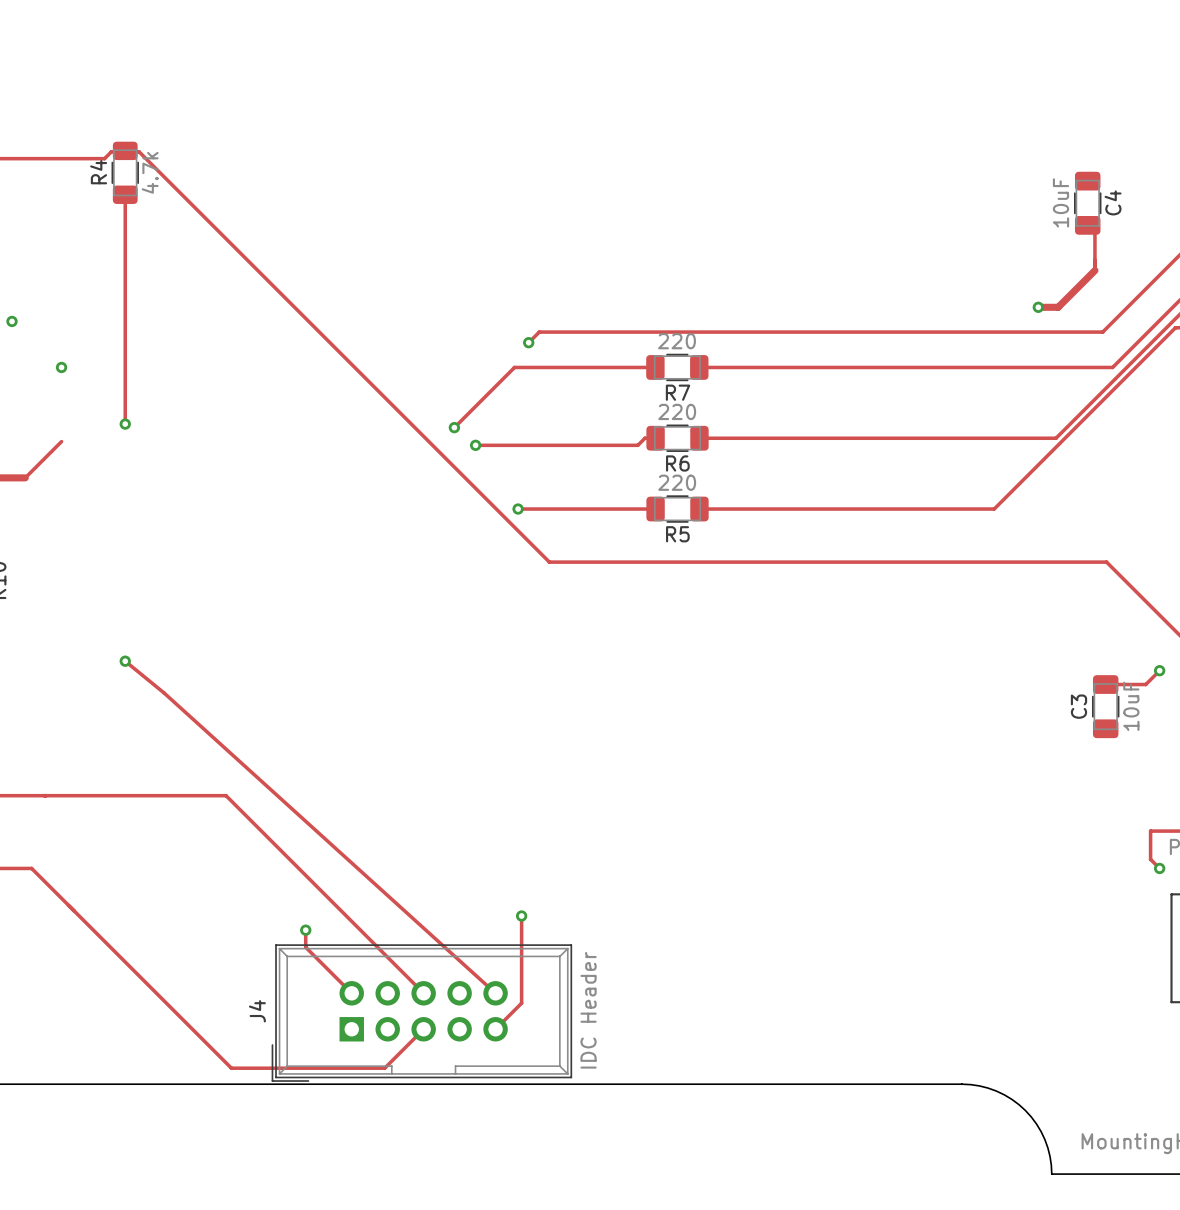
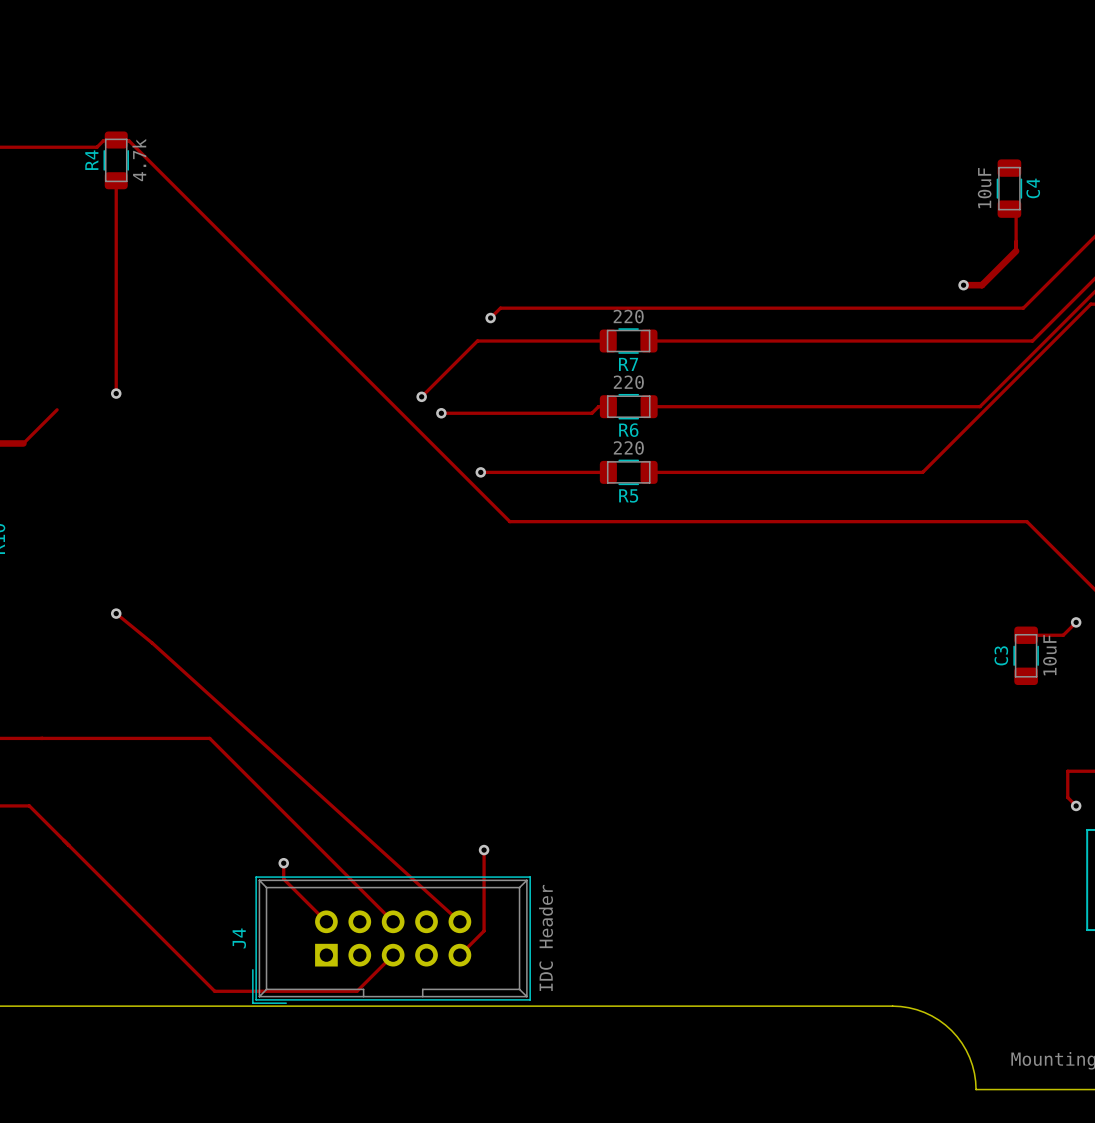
via: (12, 321) -> none
via: (61, 367) -> none

